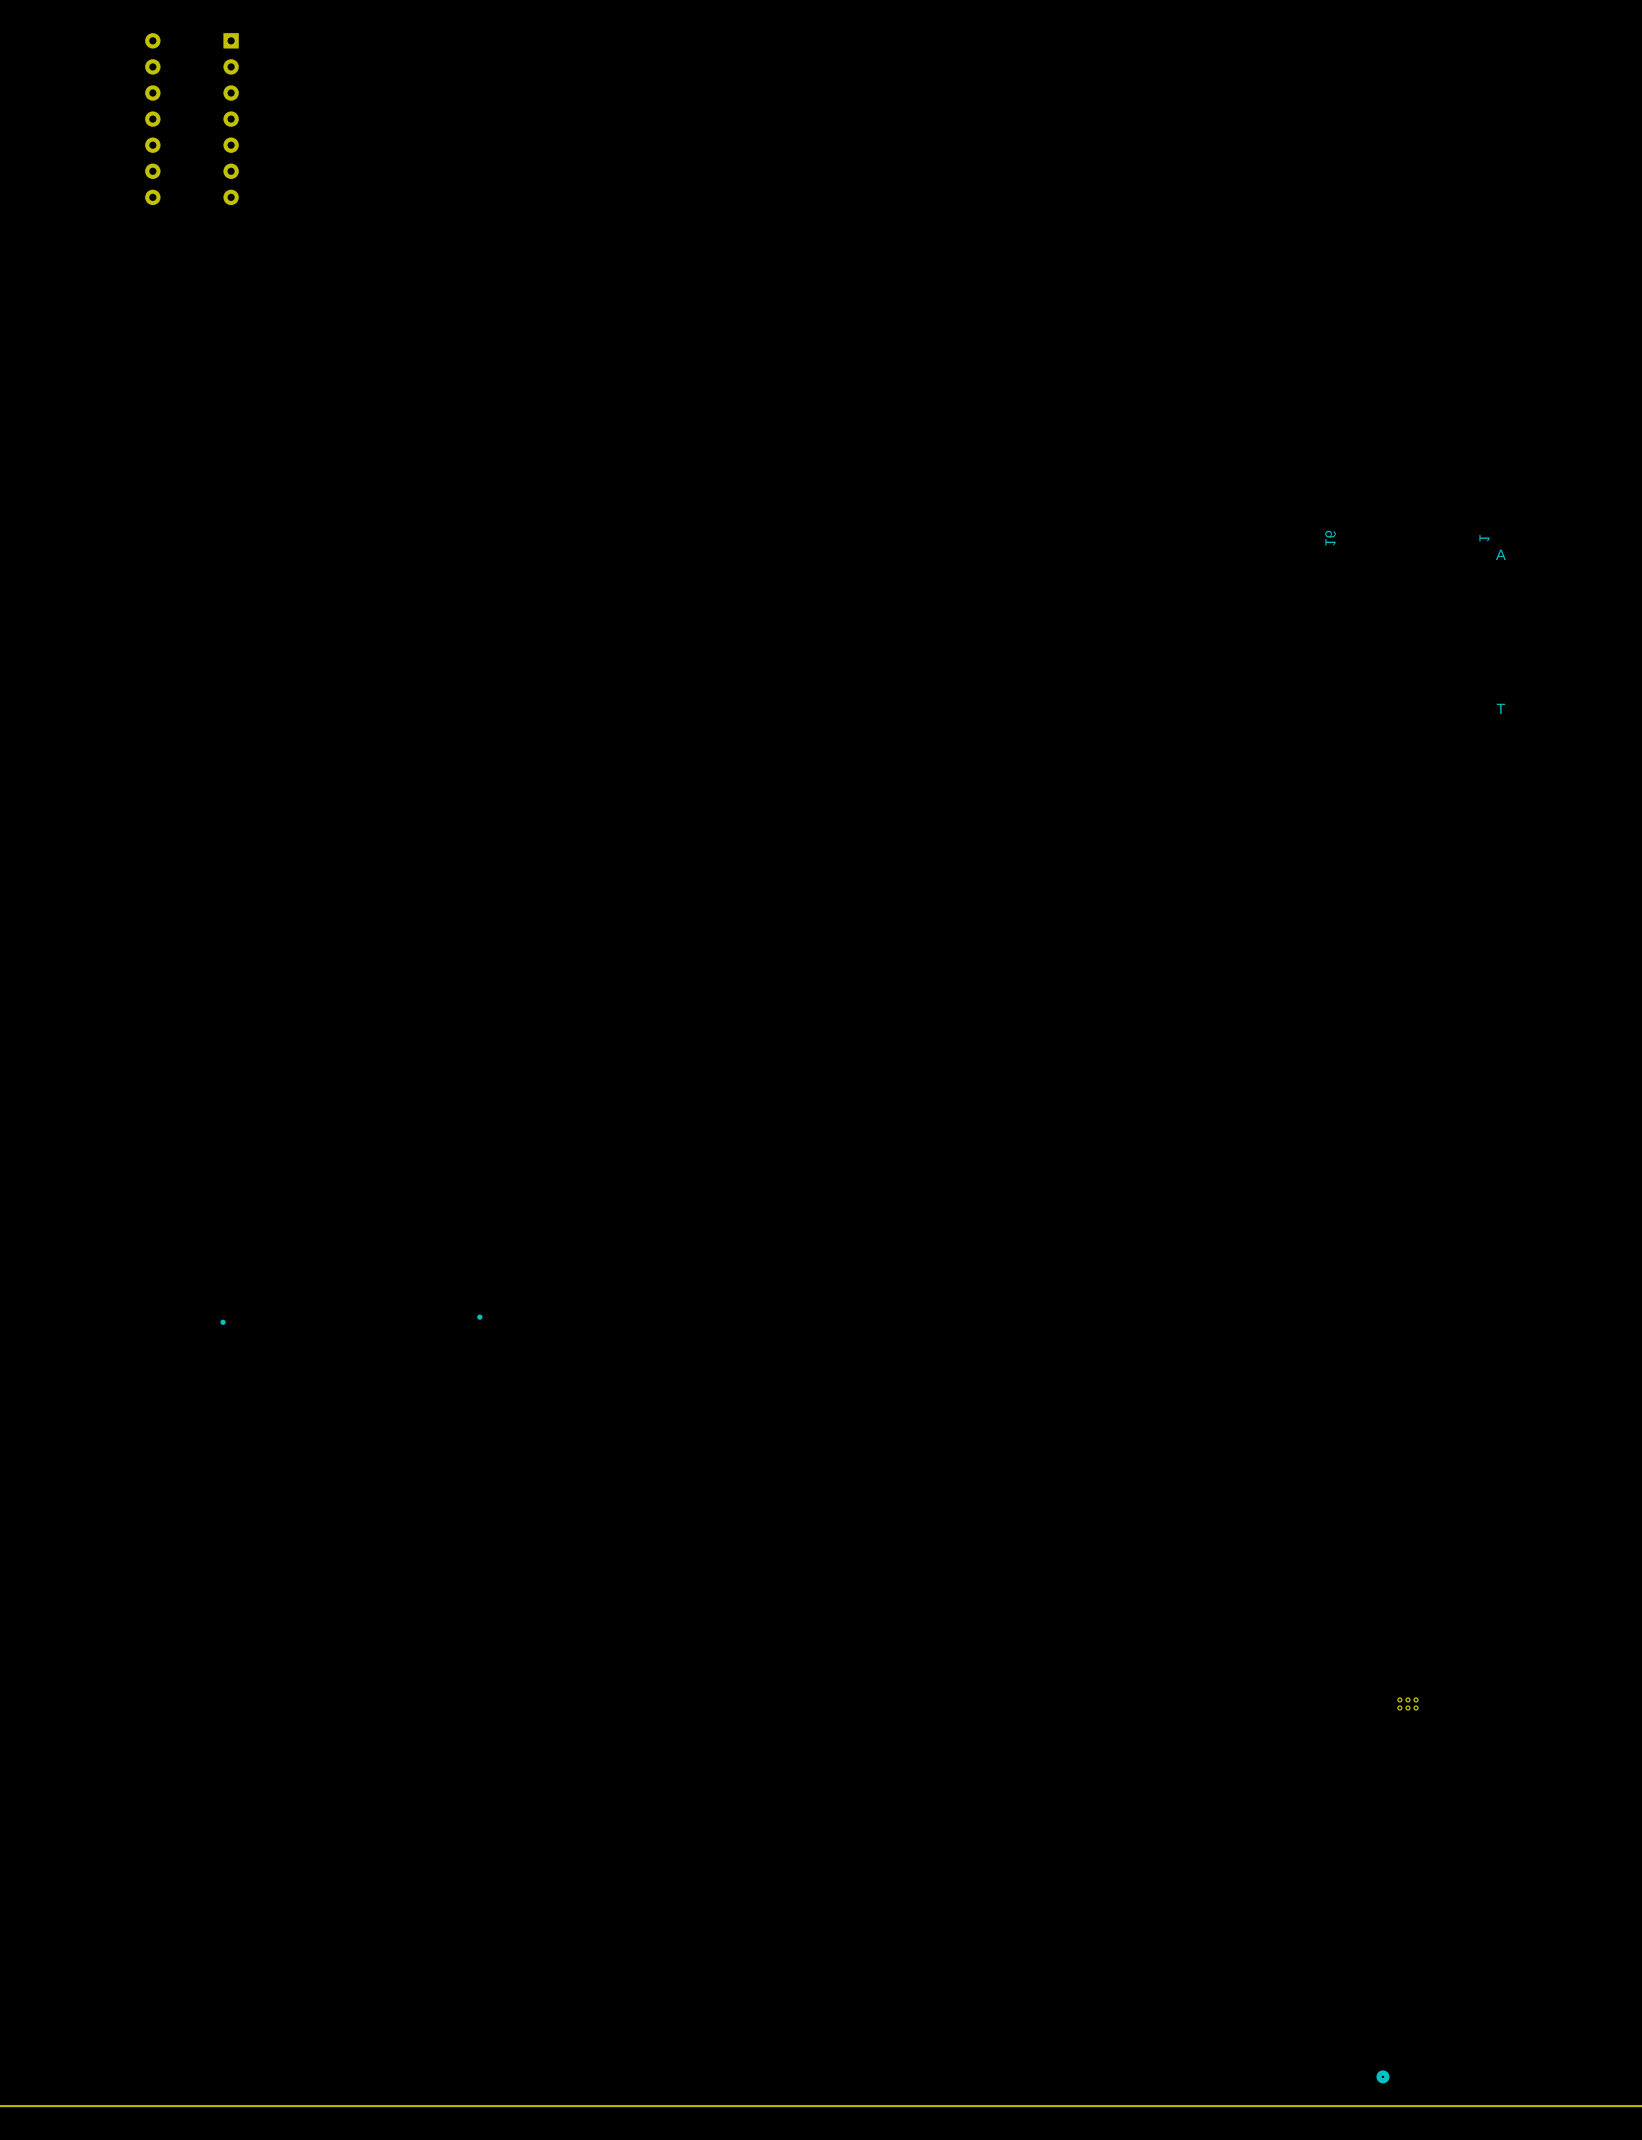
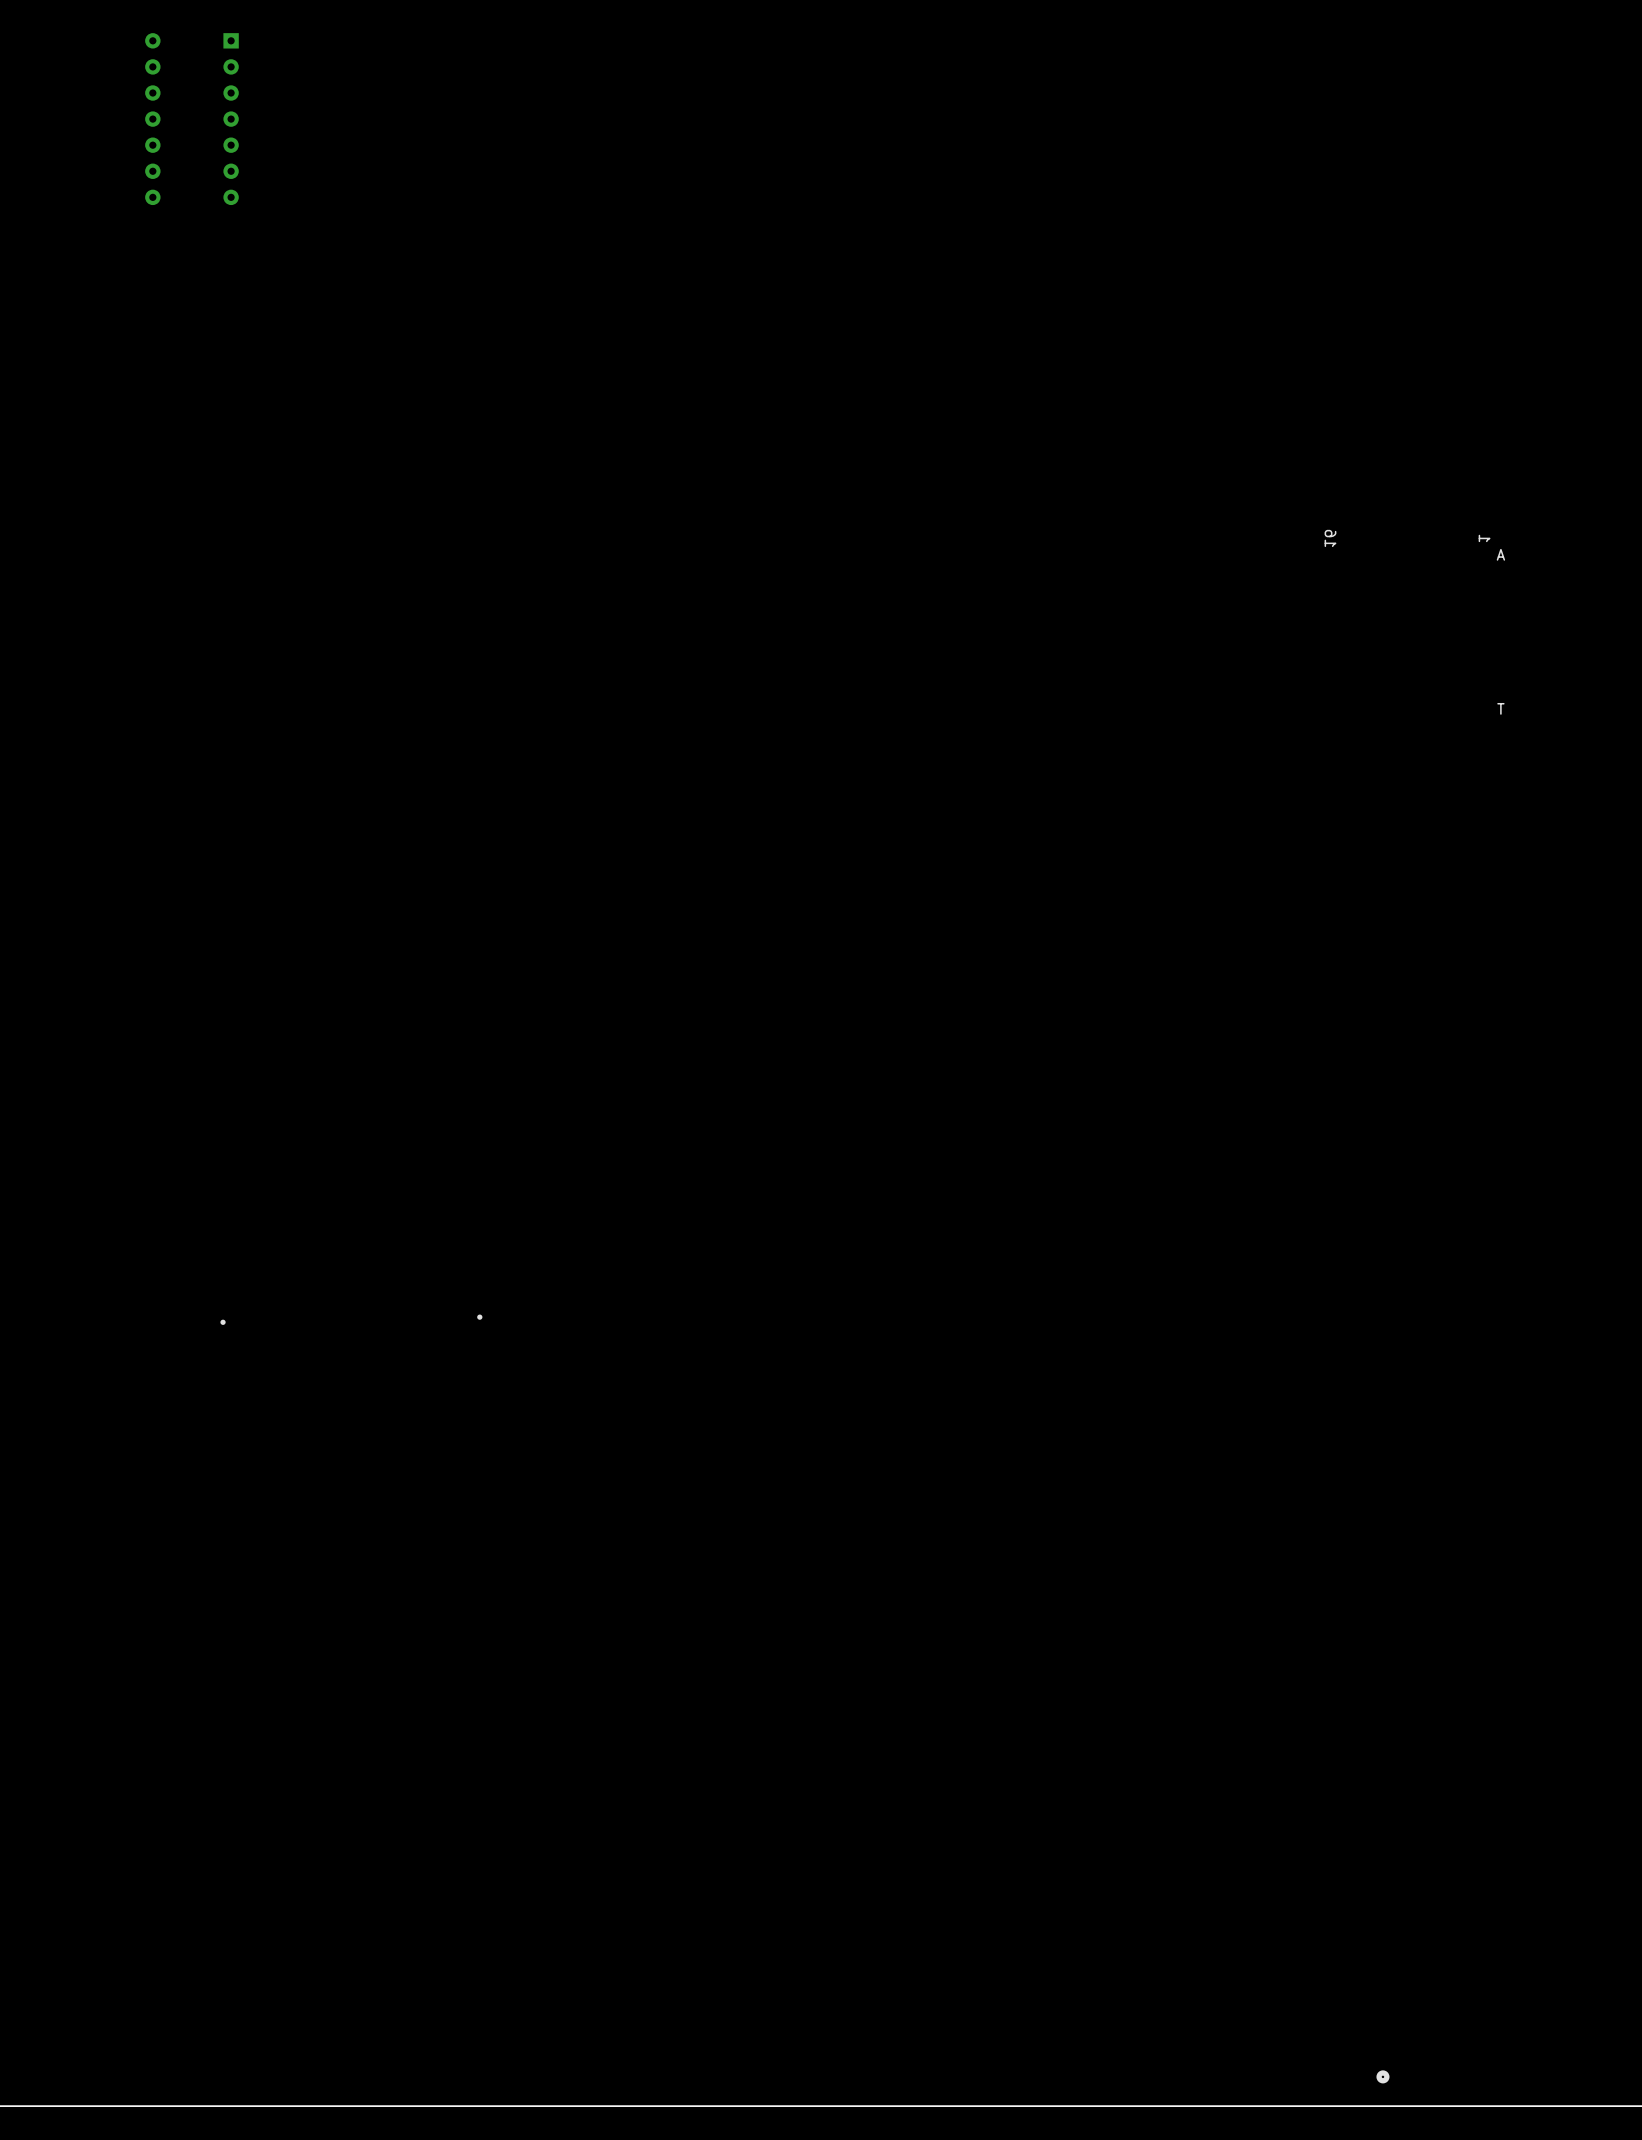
part: (1407, 1703) -> none

